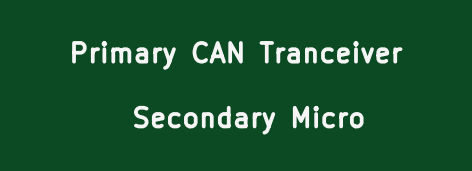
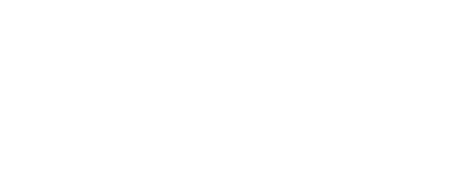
text: Primary CAN Tranceiver (237, 55) -> none
text: Secondary Micro (248, 120) -> none

